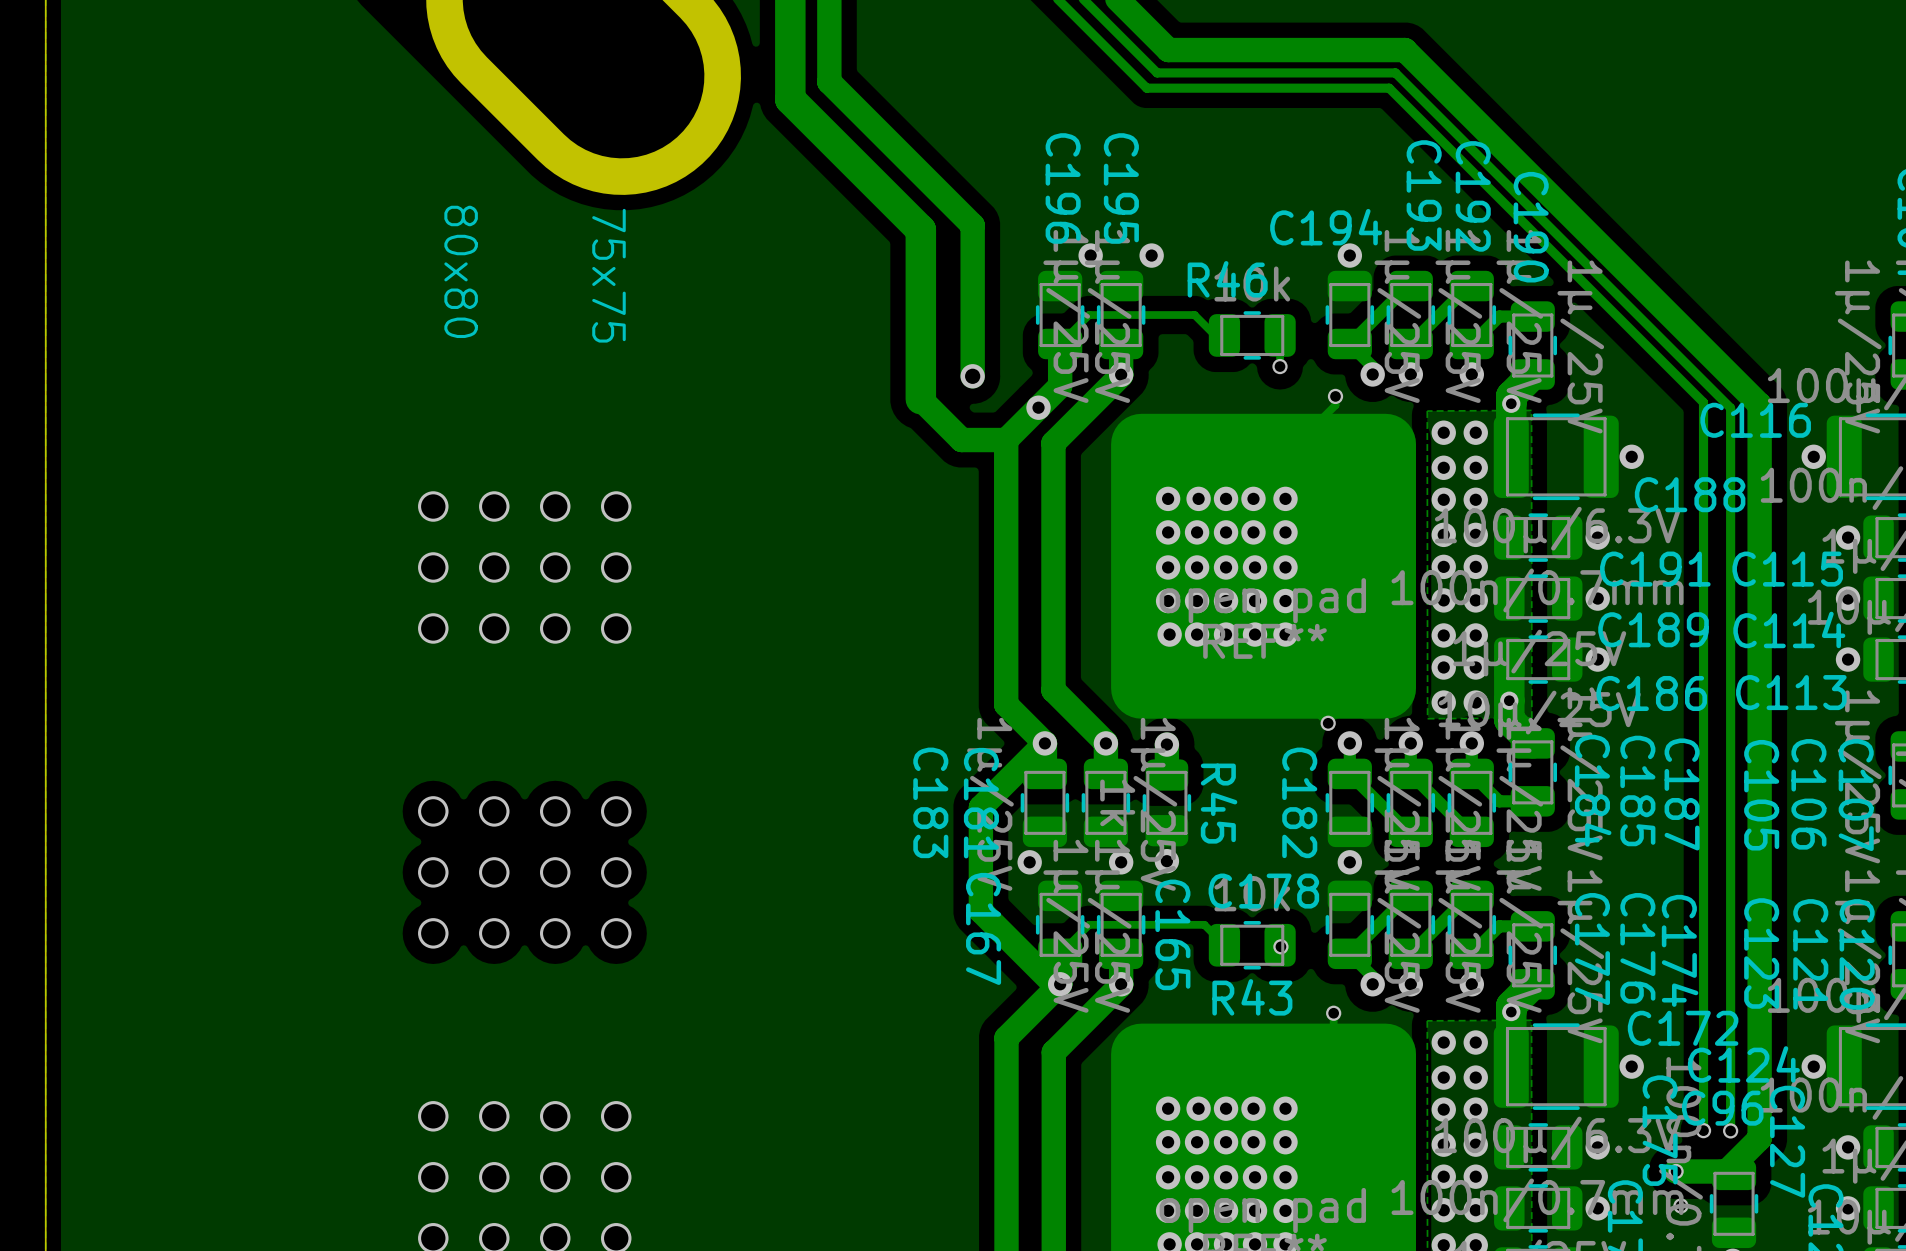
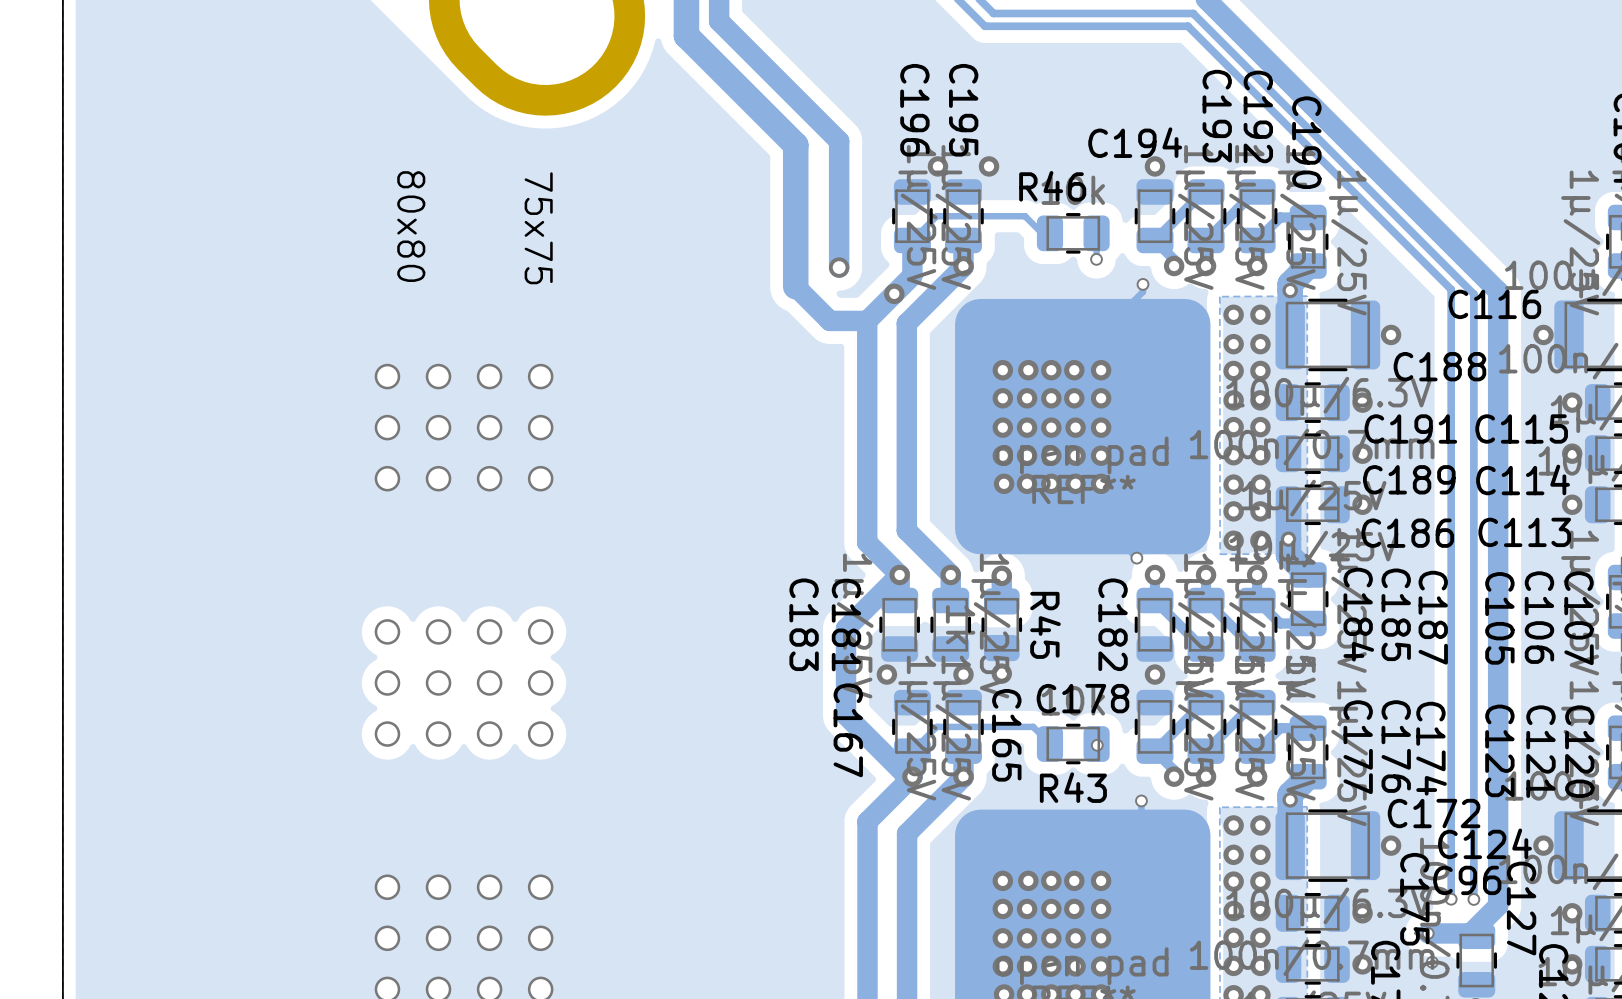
text position: 80x80 (461, 271) -> 80x80 (411, 226)
text position: 75x75 (608, 275) -> 75x75 (538, 228)

